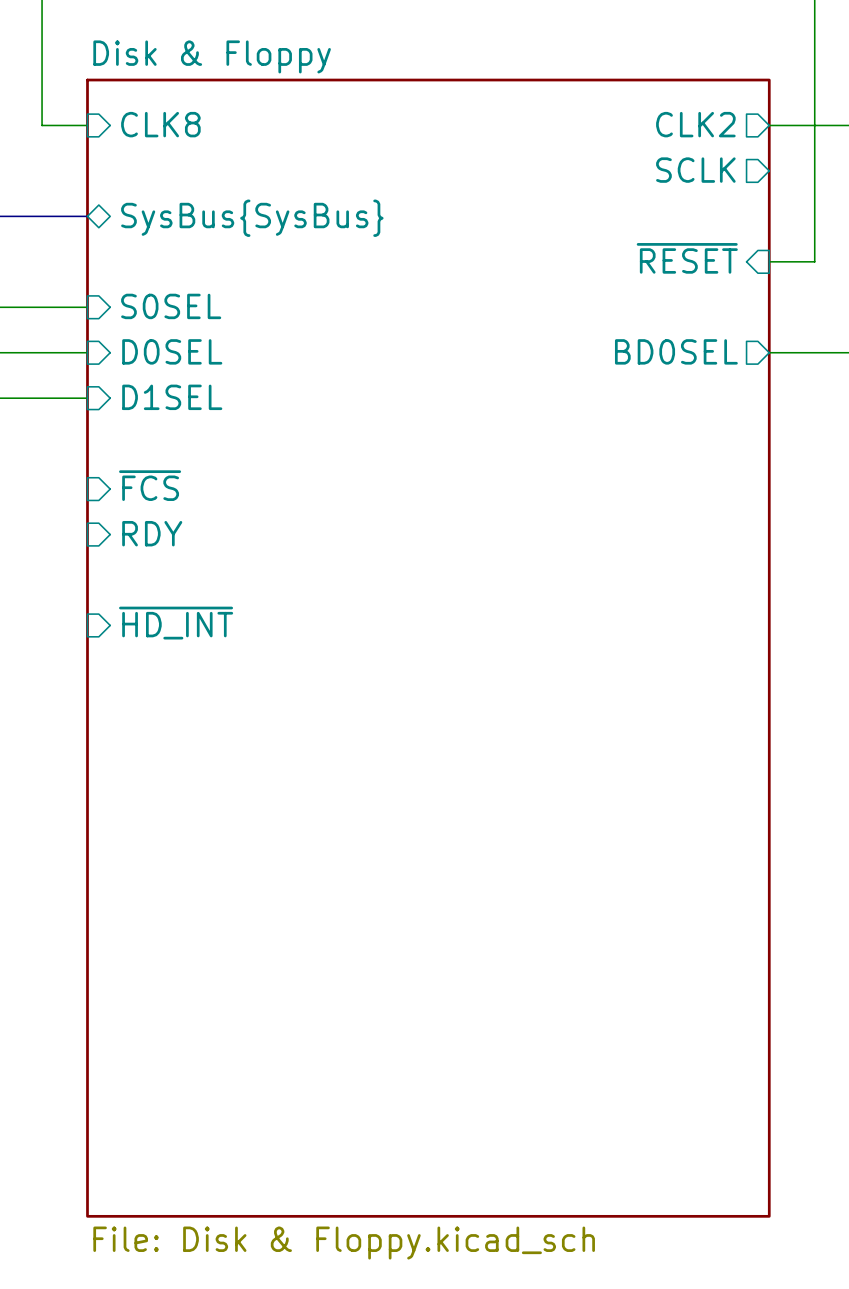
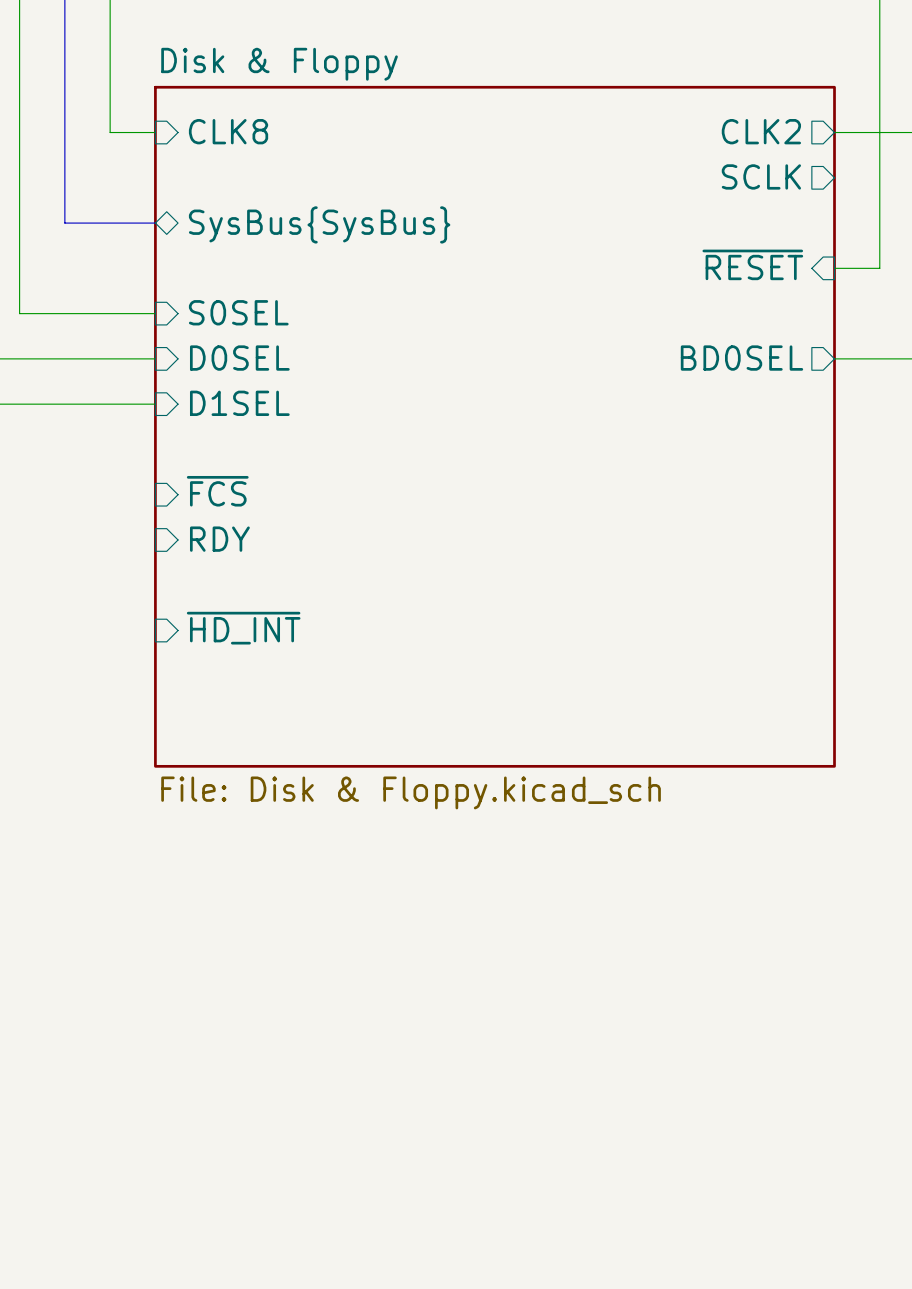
sheet Disk & Floppy: none -> File: Disk & Floppy.kicad_sch (494, 426)
sheet Disk & Floppy: File: Disk & Floppy.kicad_sch (428, 648) -> none

